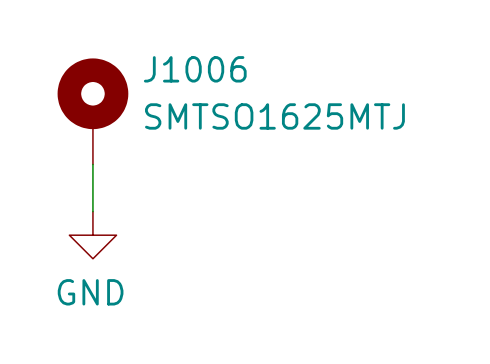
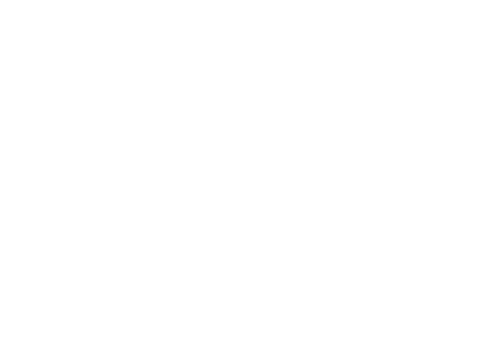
J1006: SMTSO1625MTJ (92, 111) -> none
wire: (92, 164) (92, 211) -> none
power symbol: GND (92, 235) -> none

